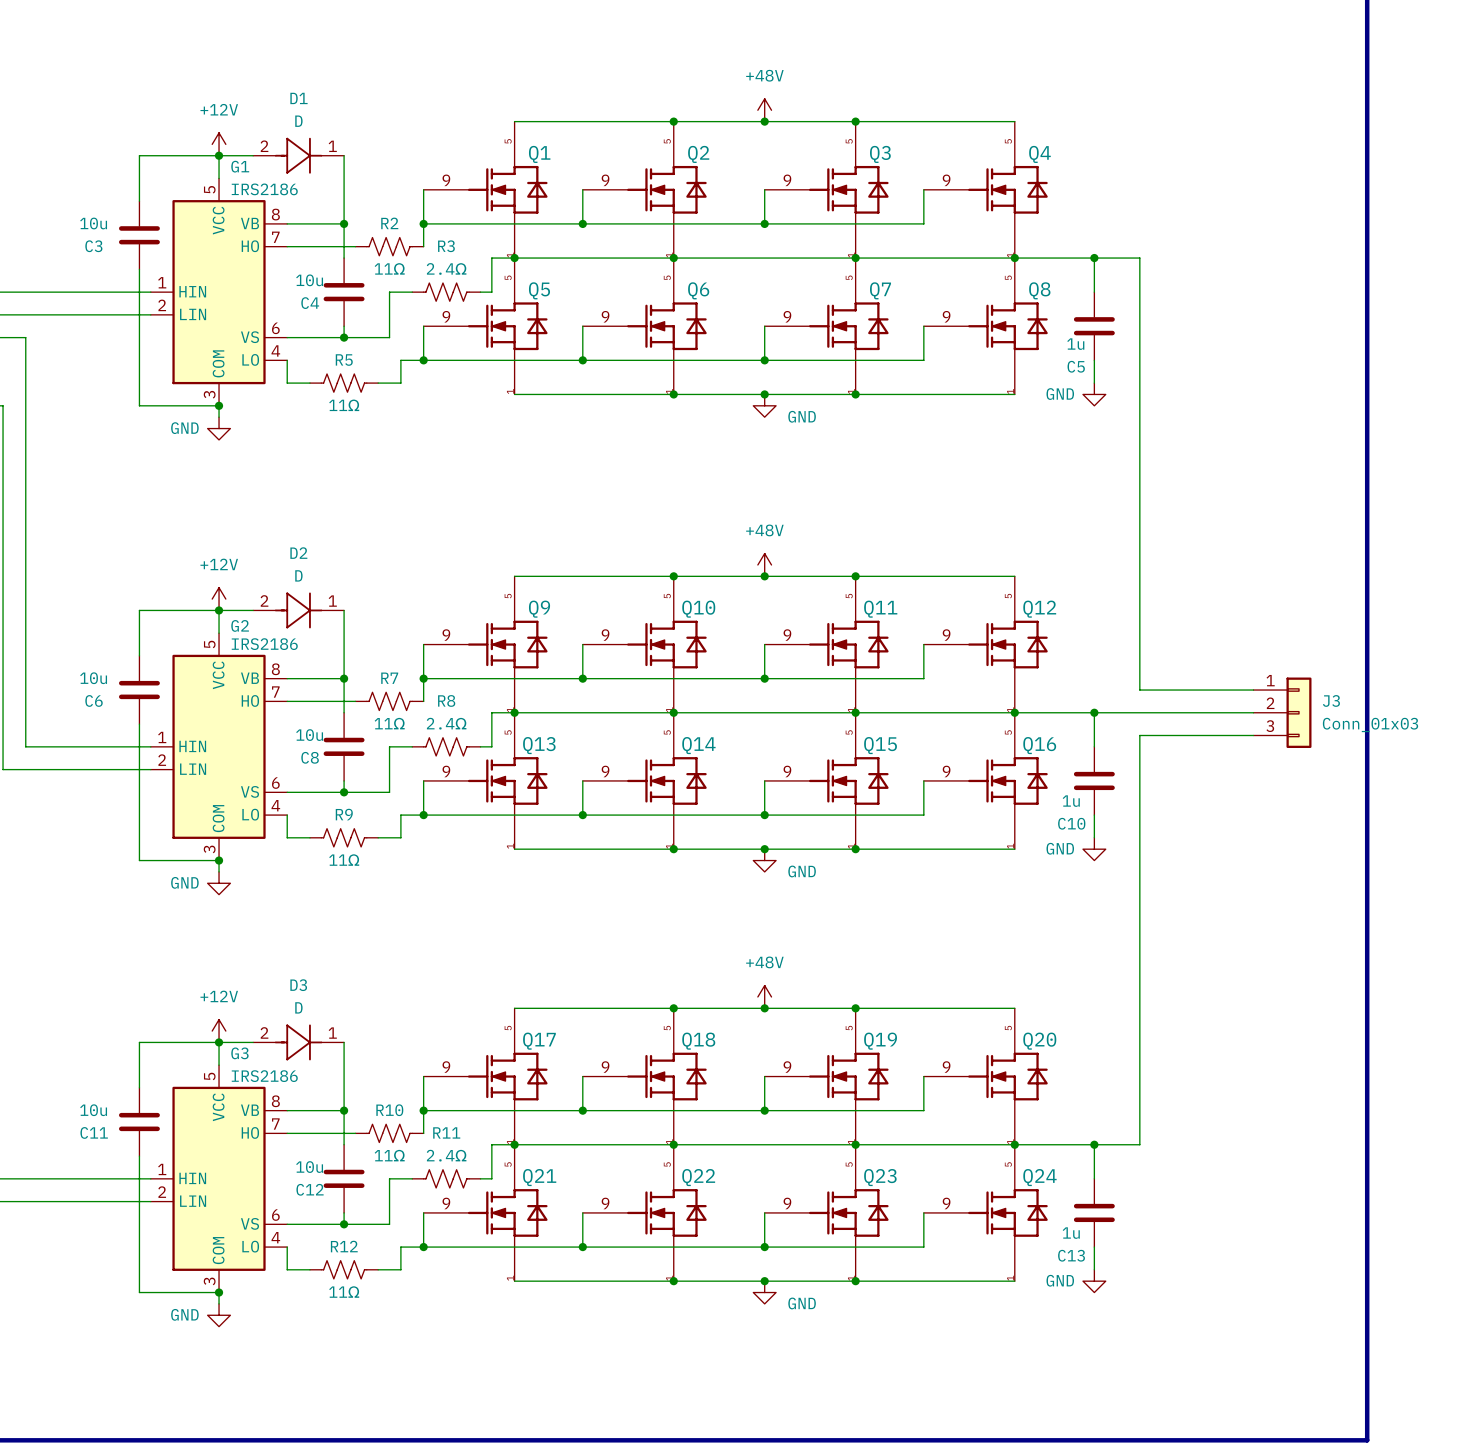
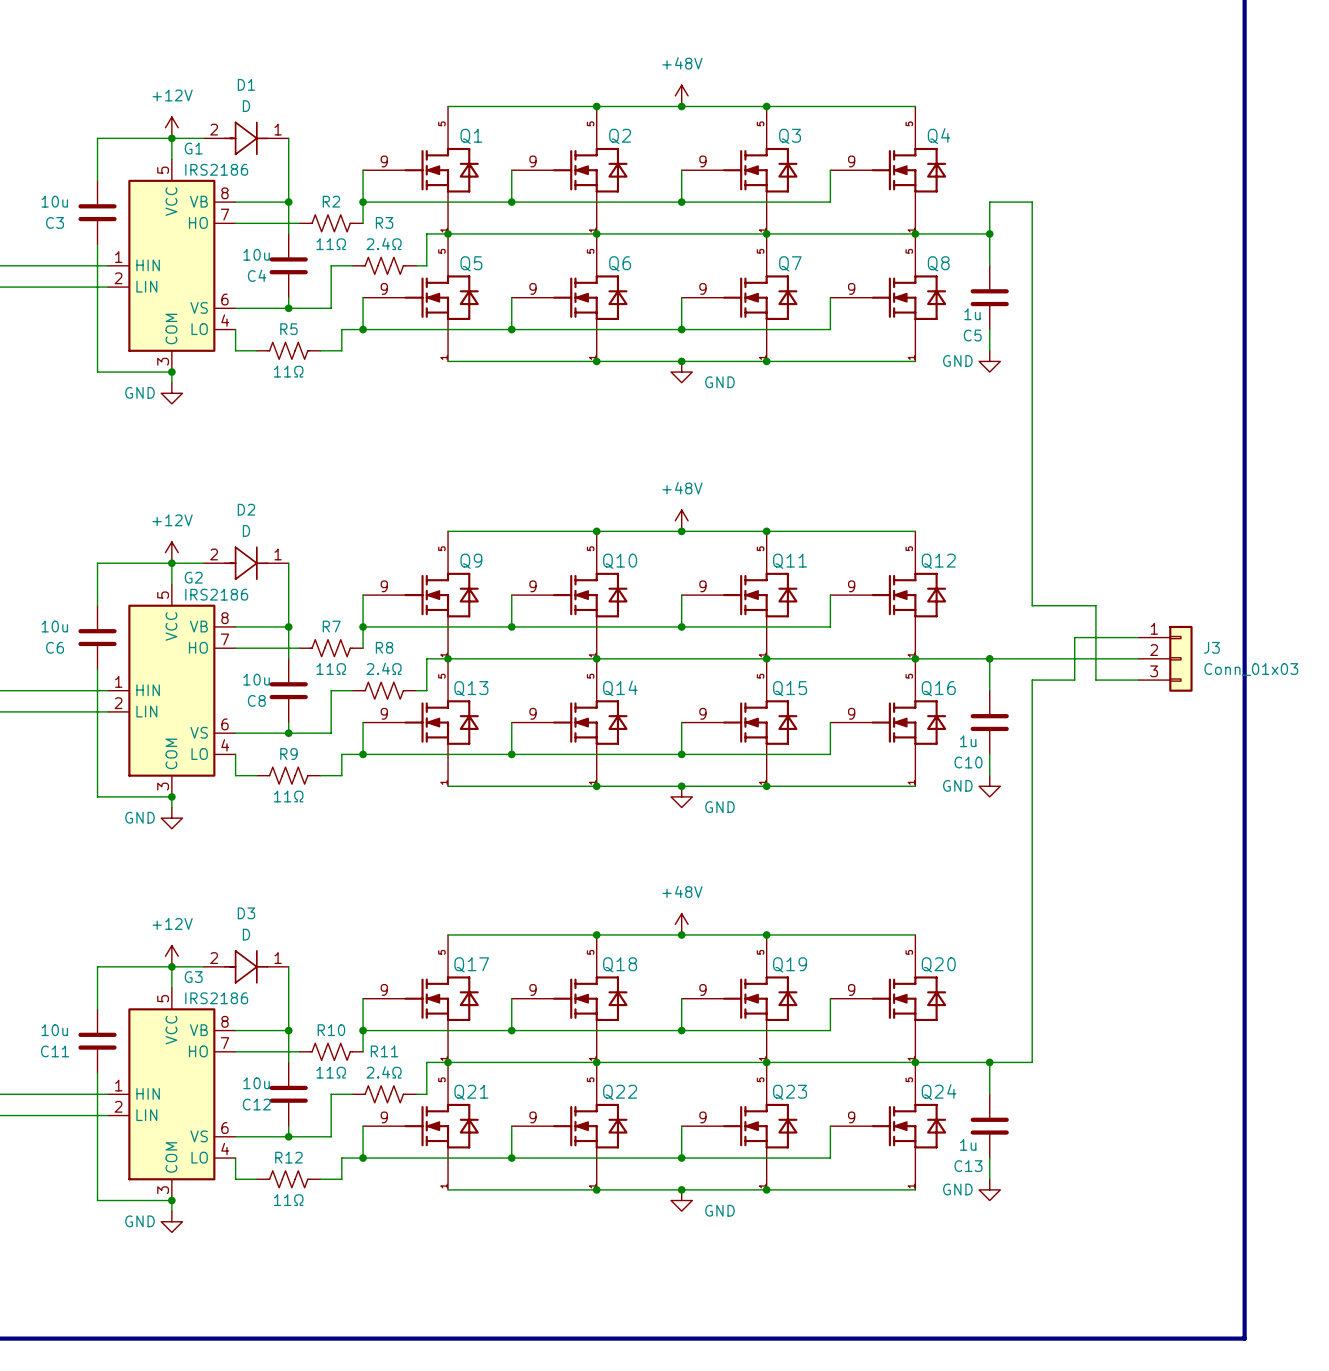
wire: (1094, 258) (1139, 258) -> (989, 233) (989, 202) (1032, 202) (1032, 233)
wire: (1139, 655) (1139, 690) (1185, 690) -> (1032, 605) (1095, 605) (1095, 680)
wire: (1185, 735) (1208, 735) -> (1074, 680) (1074, 637)

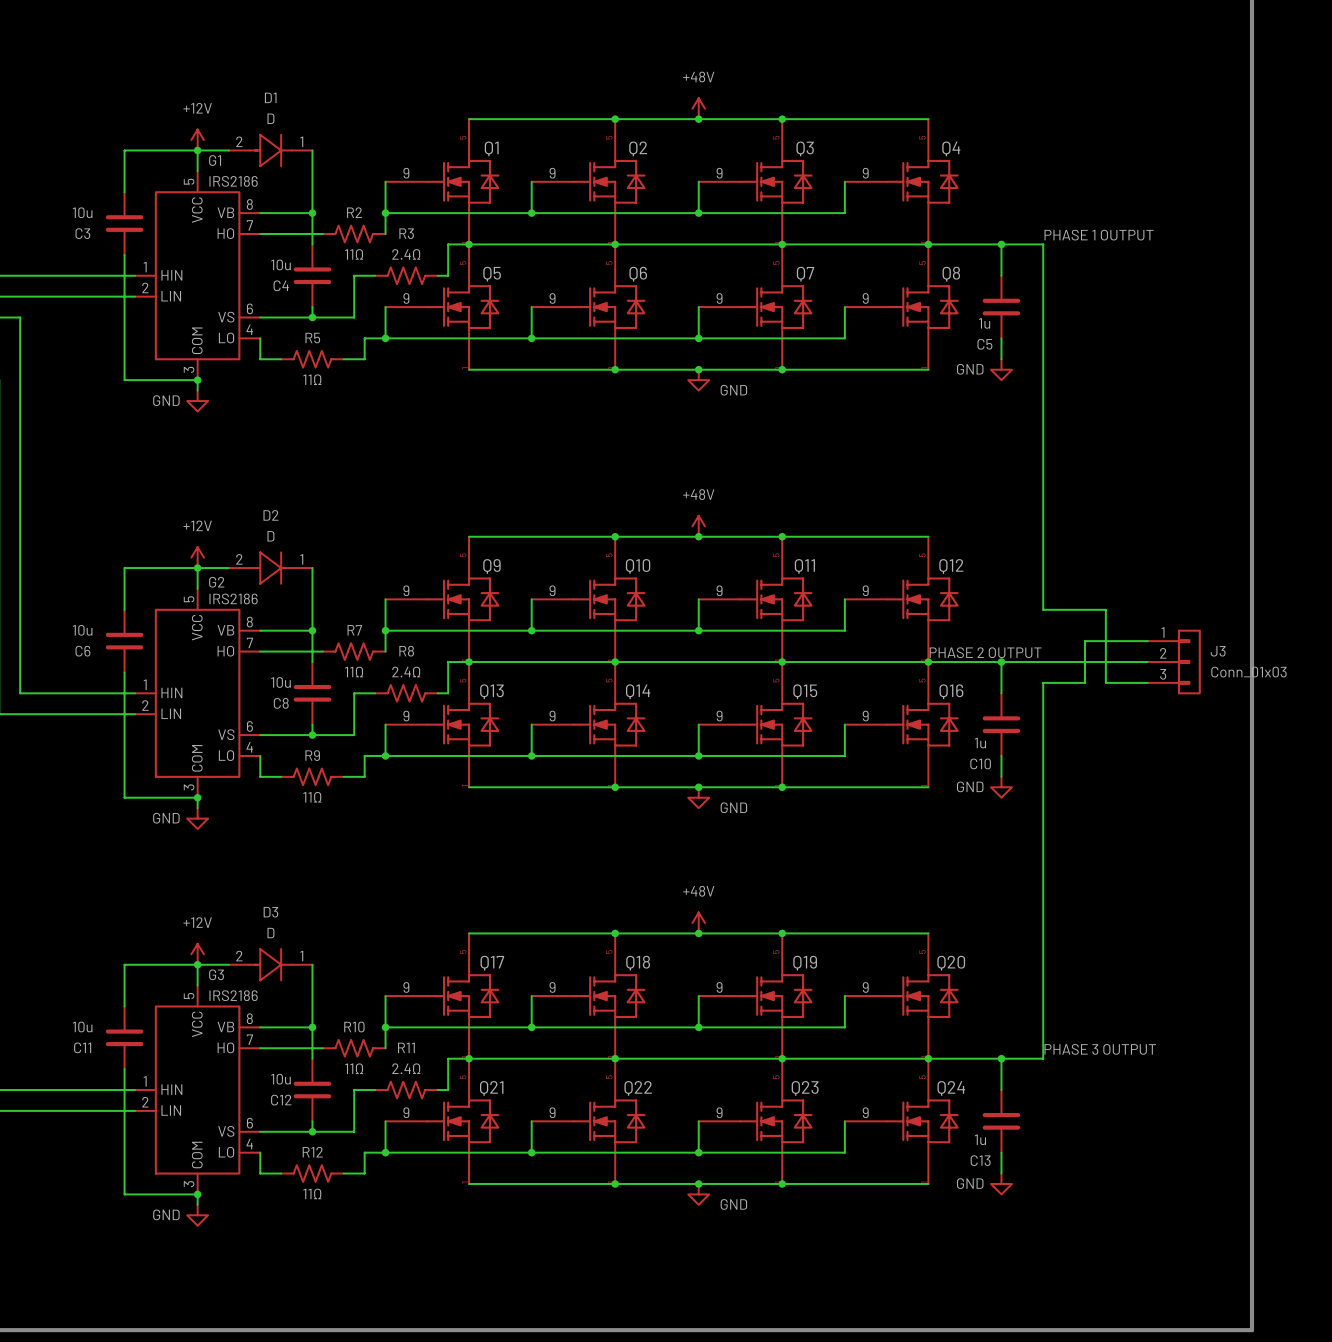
label: none -> PHASE 1 OUTPUT (1099, 235)
wire: (989, 233) (989, 202) (1032, 202) (1032, 233) -> (1001, 244) (1043, 244)
label: none -> PHASE 2 OUTPUT (985, 652)
label: none -> PHASE 3 OUTPUT (1100, 1049)

